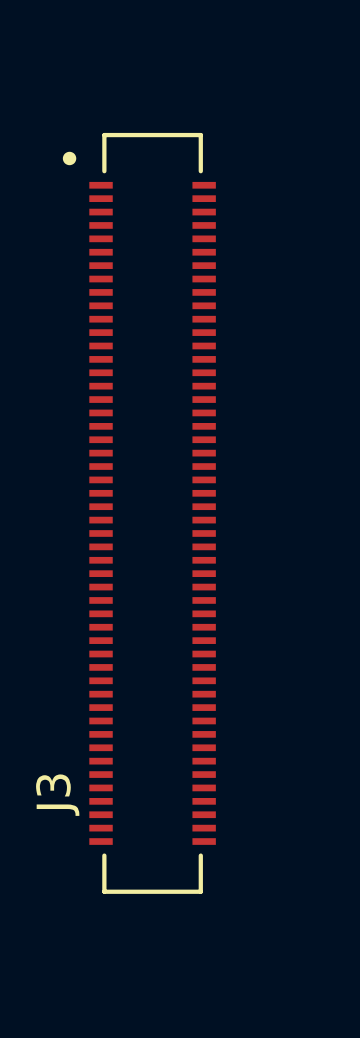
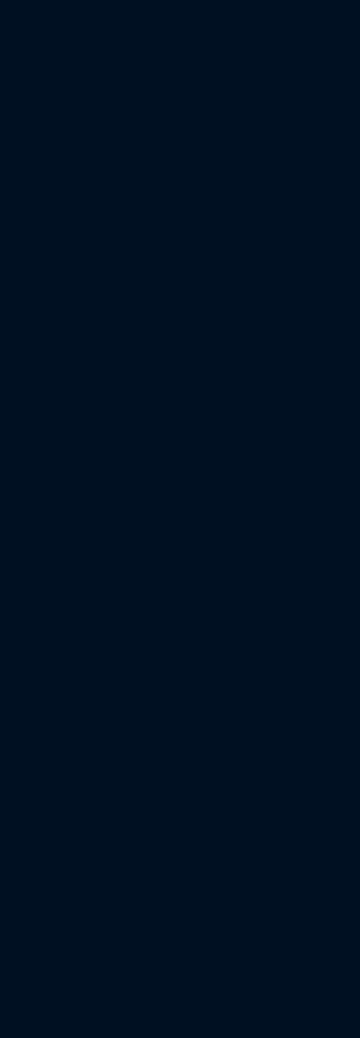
J3: (139, 513) -> none

